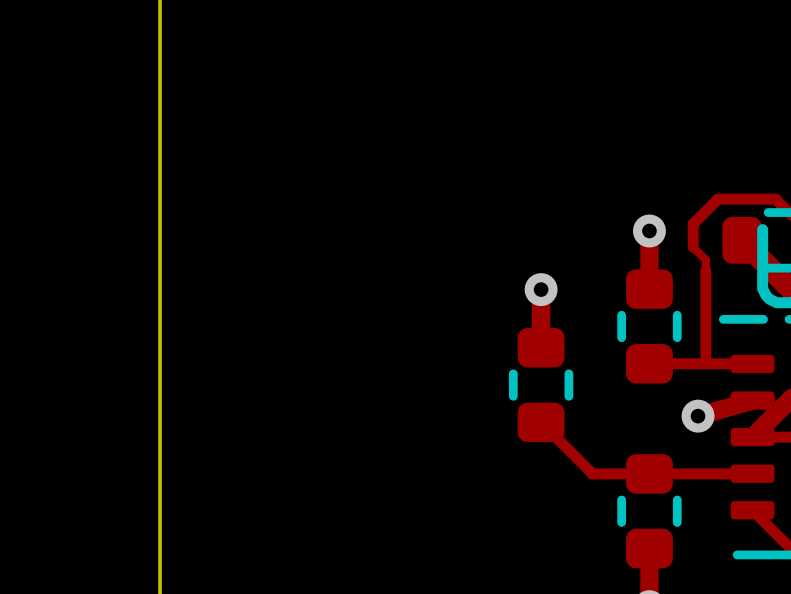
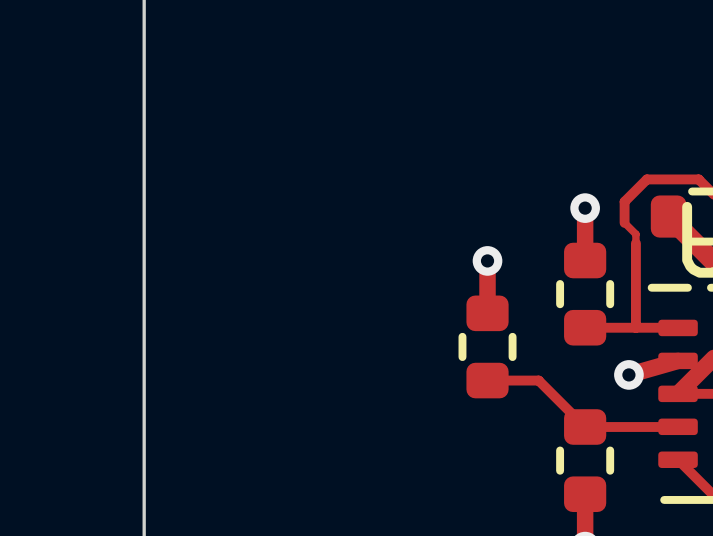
top track: (541, 422) (592, 473) (649, 473) -> (487, 380) (538, 380) (585, 427)

